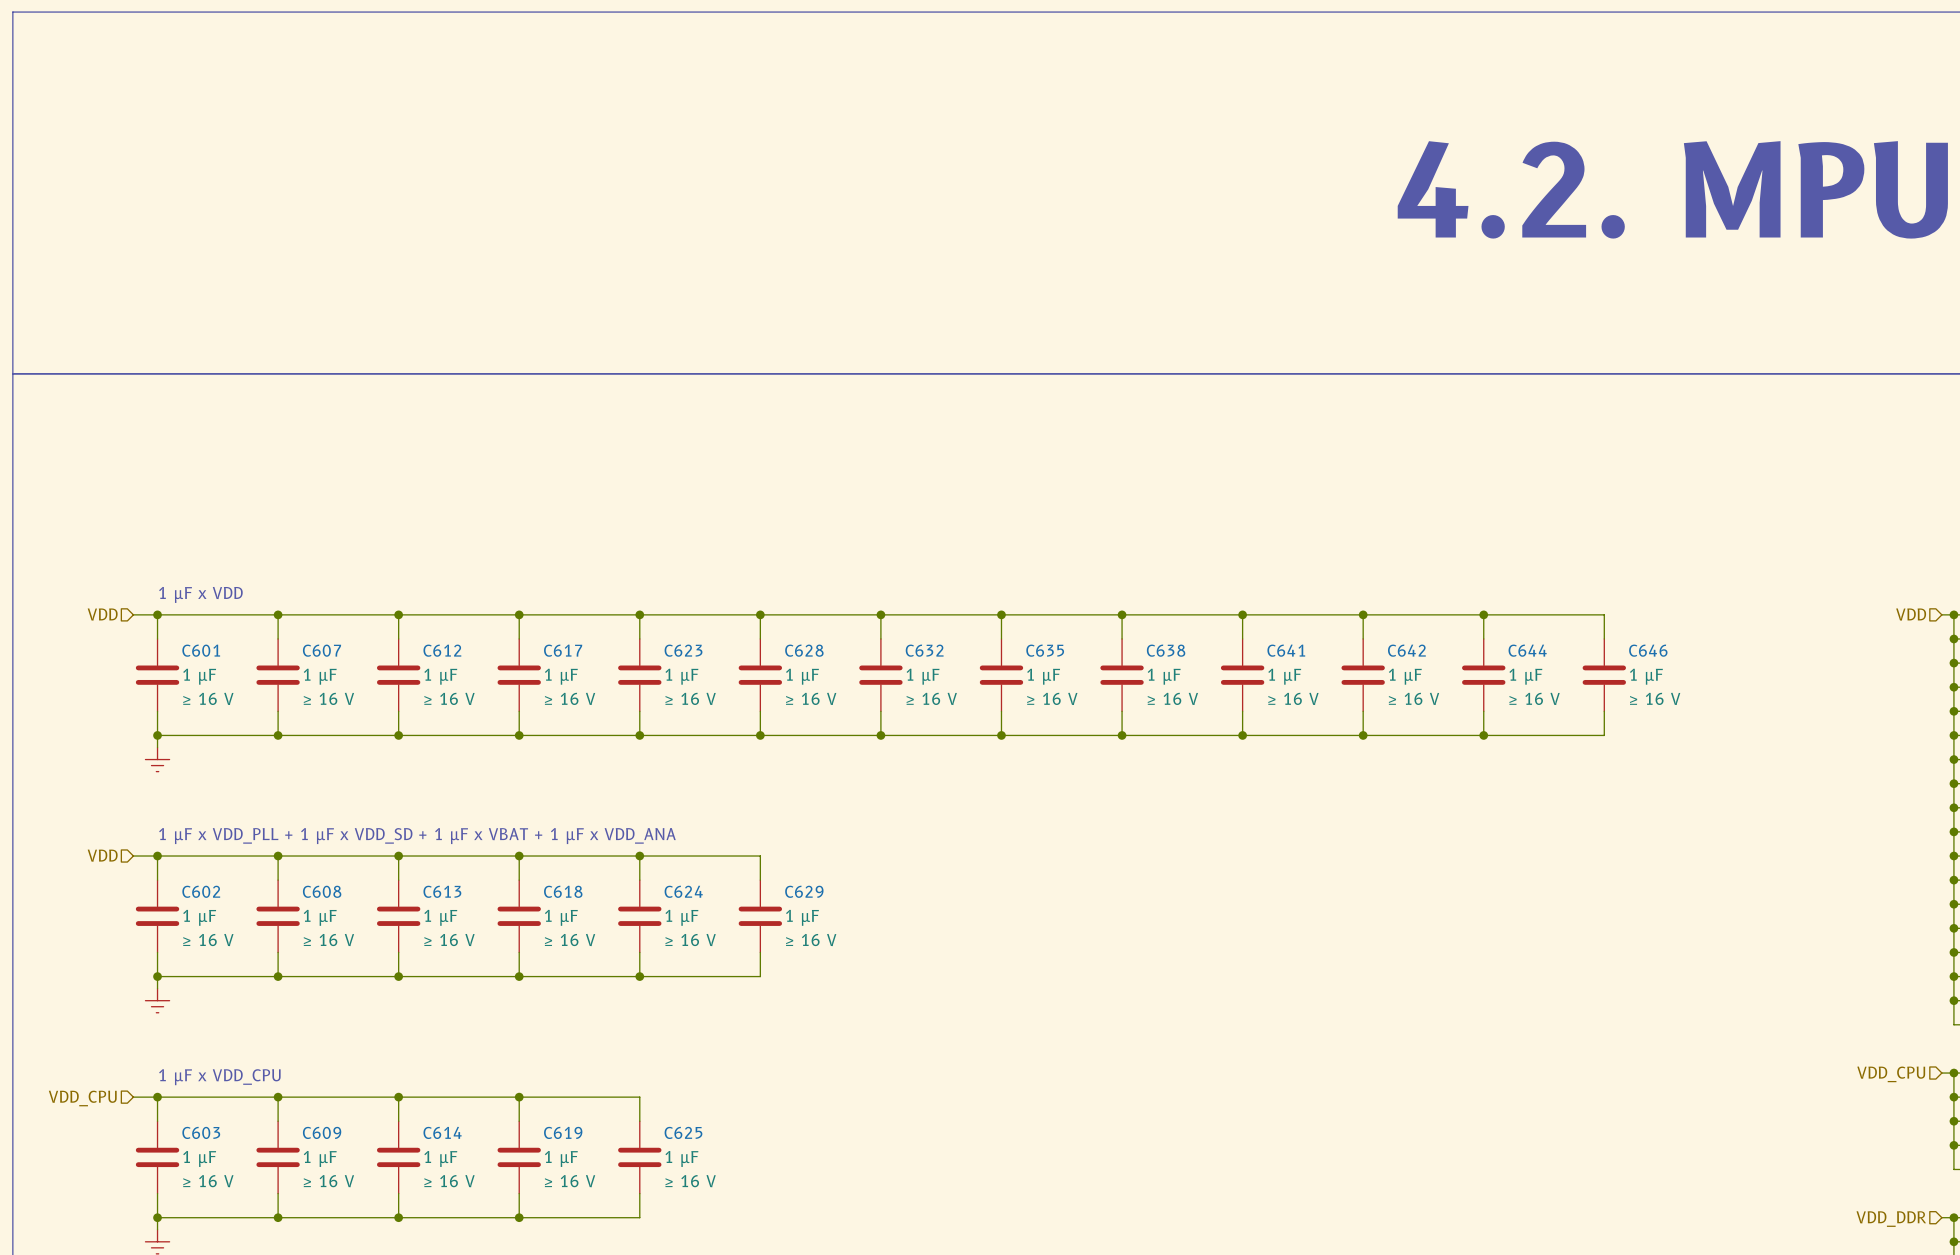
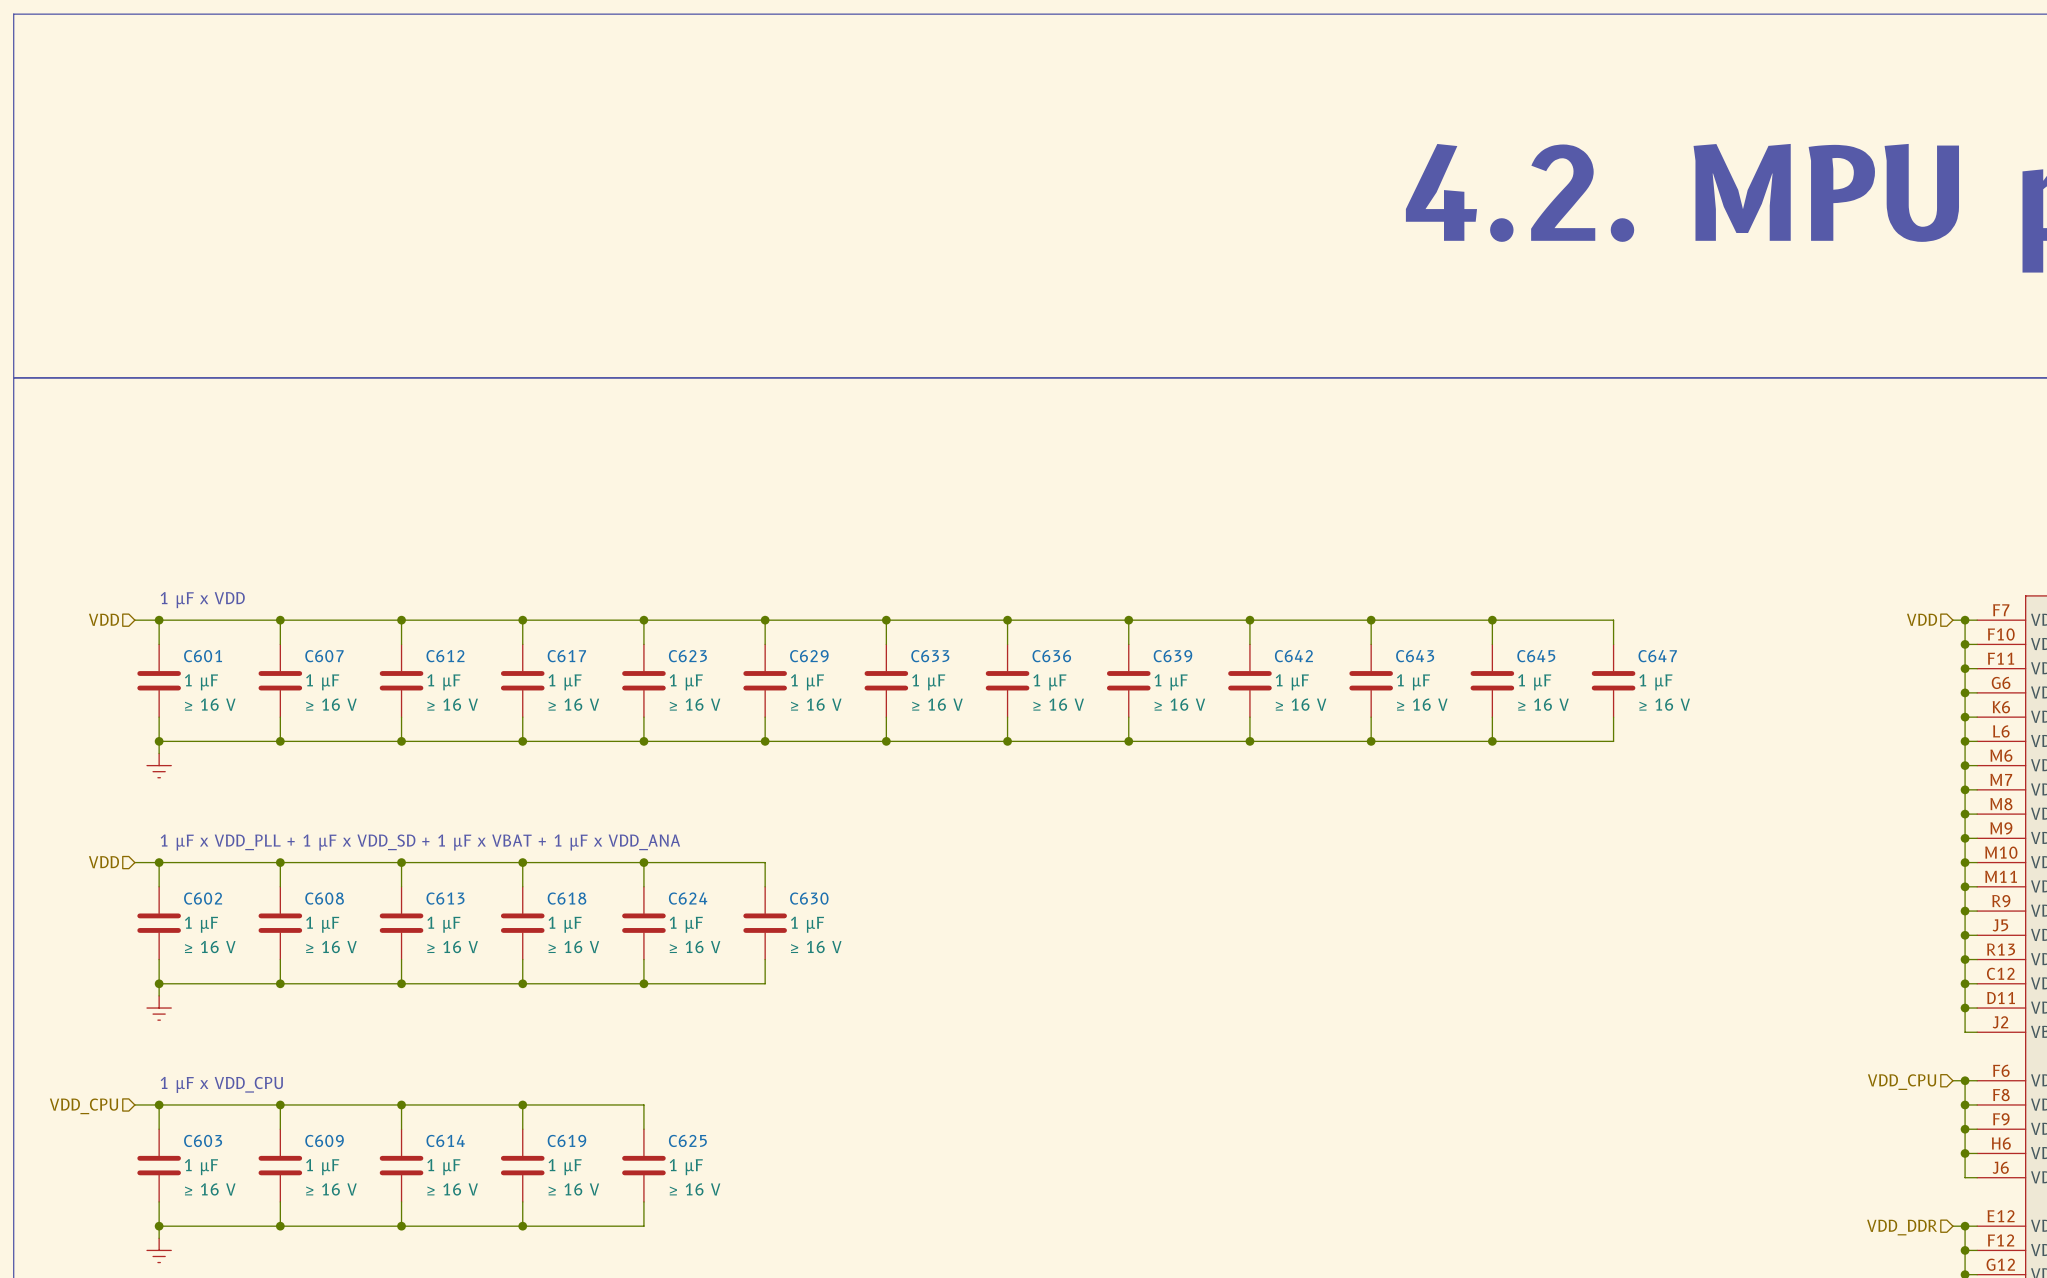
C628 name: C628 (804, 650) -> C629 (809, 656)
C632 name: C632 (924, 650) -> C633 (930, 656)
C635 name: C635 (1045, 650) -> C636 (1051, 656)
C638 name: C638 (1166, 650) -> C639 (1172, 656)
C641 name: C641 (1286, 650) -> C642 (1293, 656)
C642 name: C642 (1406, 650) -> C643 (1415, 656)
C644 name: C644 (1527, 650) -> C645 (1536, 656)
C646 name: C646 (1648, 650) -> C647 (1657, 656)
C629 name: C629 (804, 891) -> C630 (809, 898)

